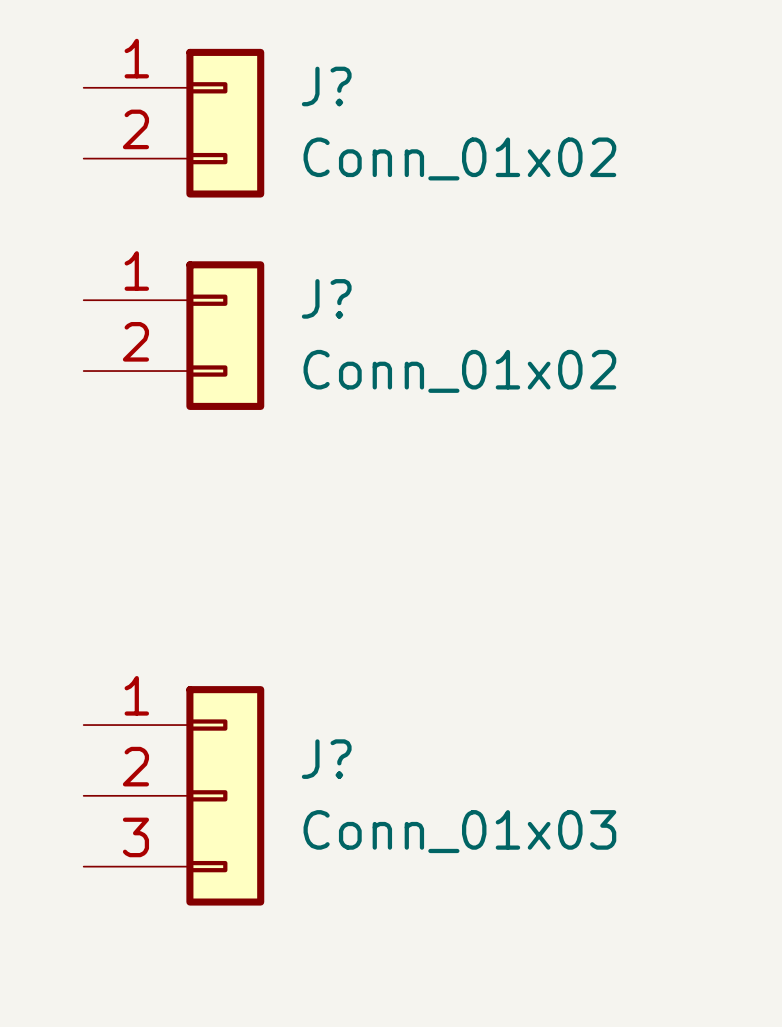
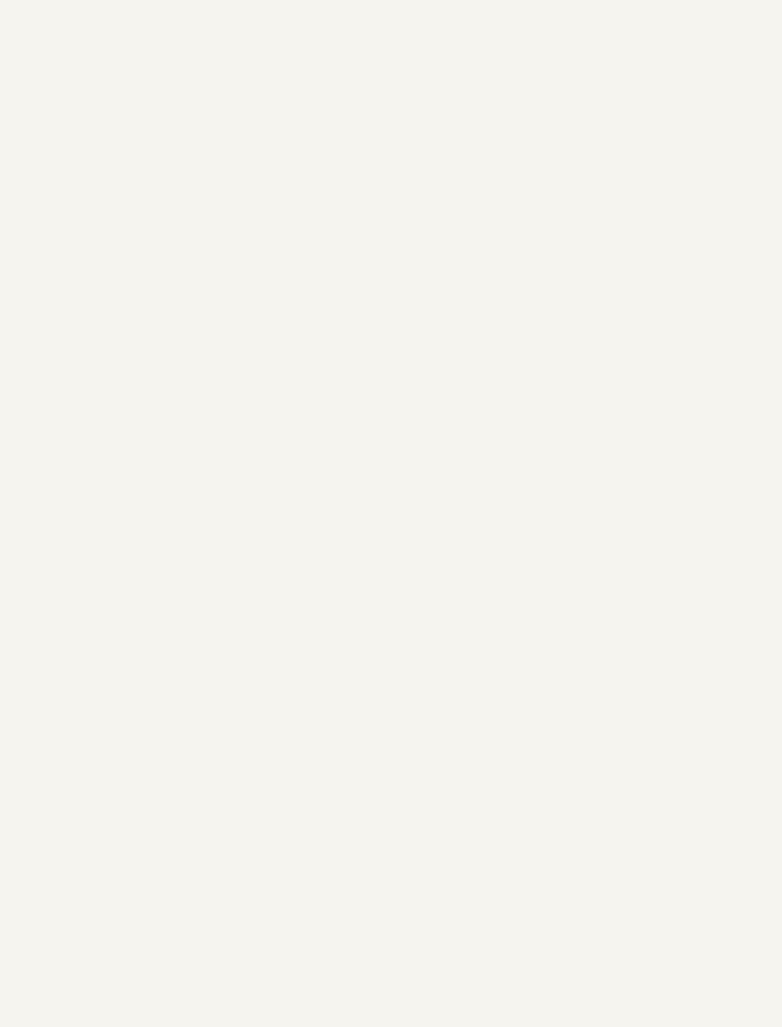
J?: Conn_01x02 (173, 123) -> none
J?: Conn_01x02 (173, 335) -> none
J?: Conn_01x03 (173, 795) -> none

